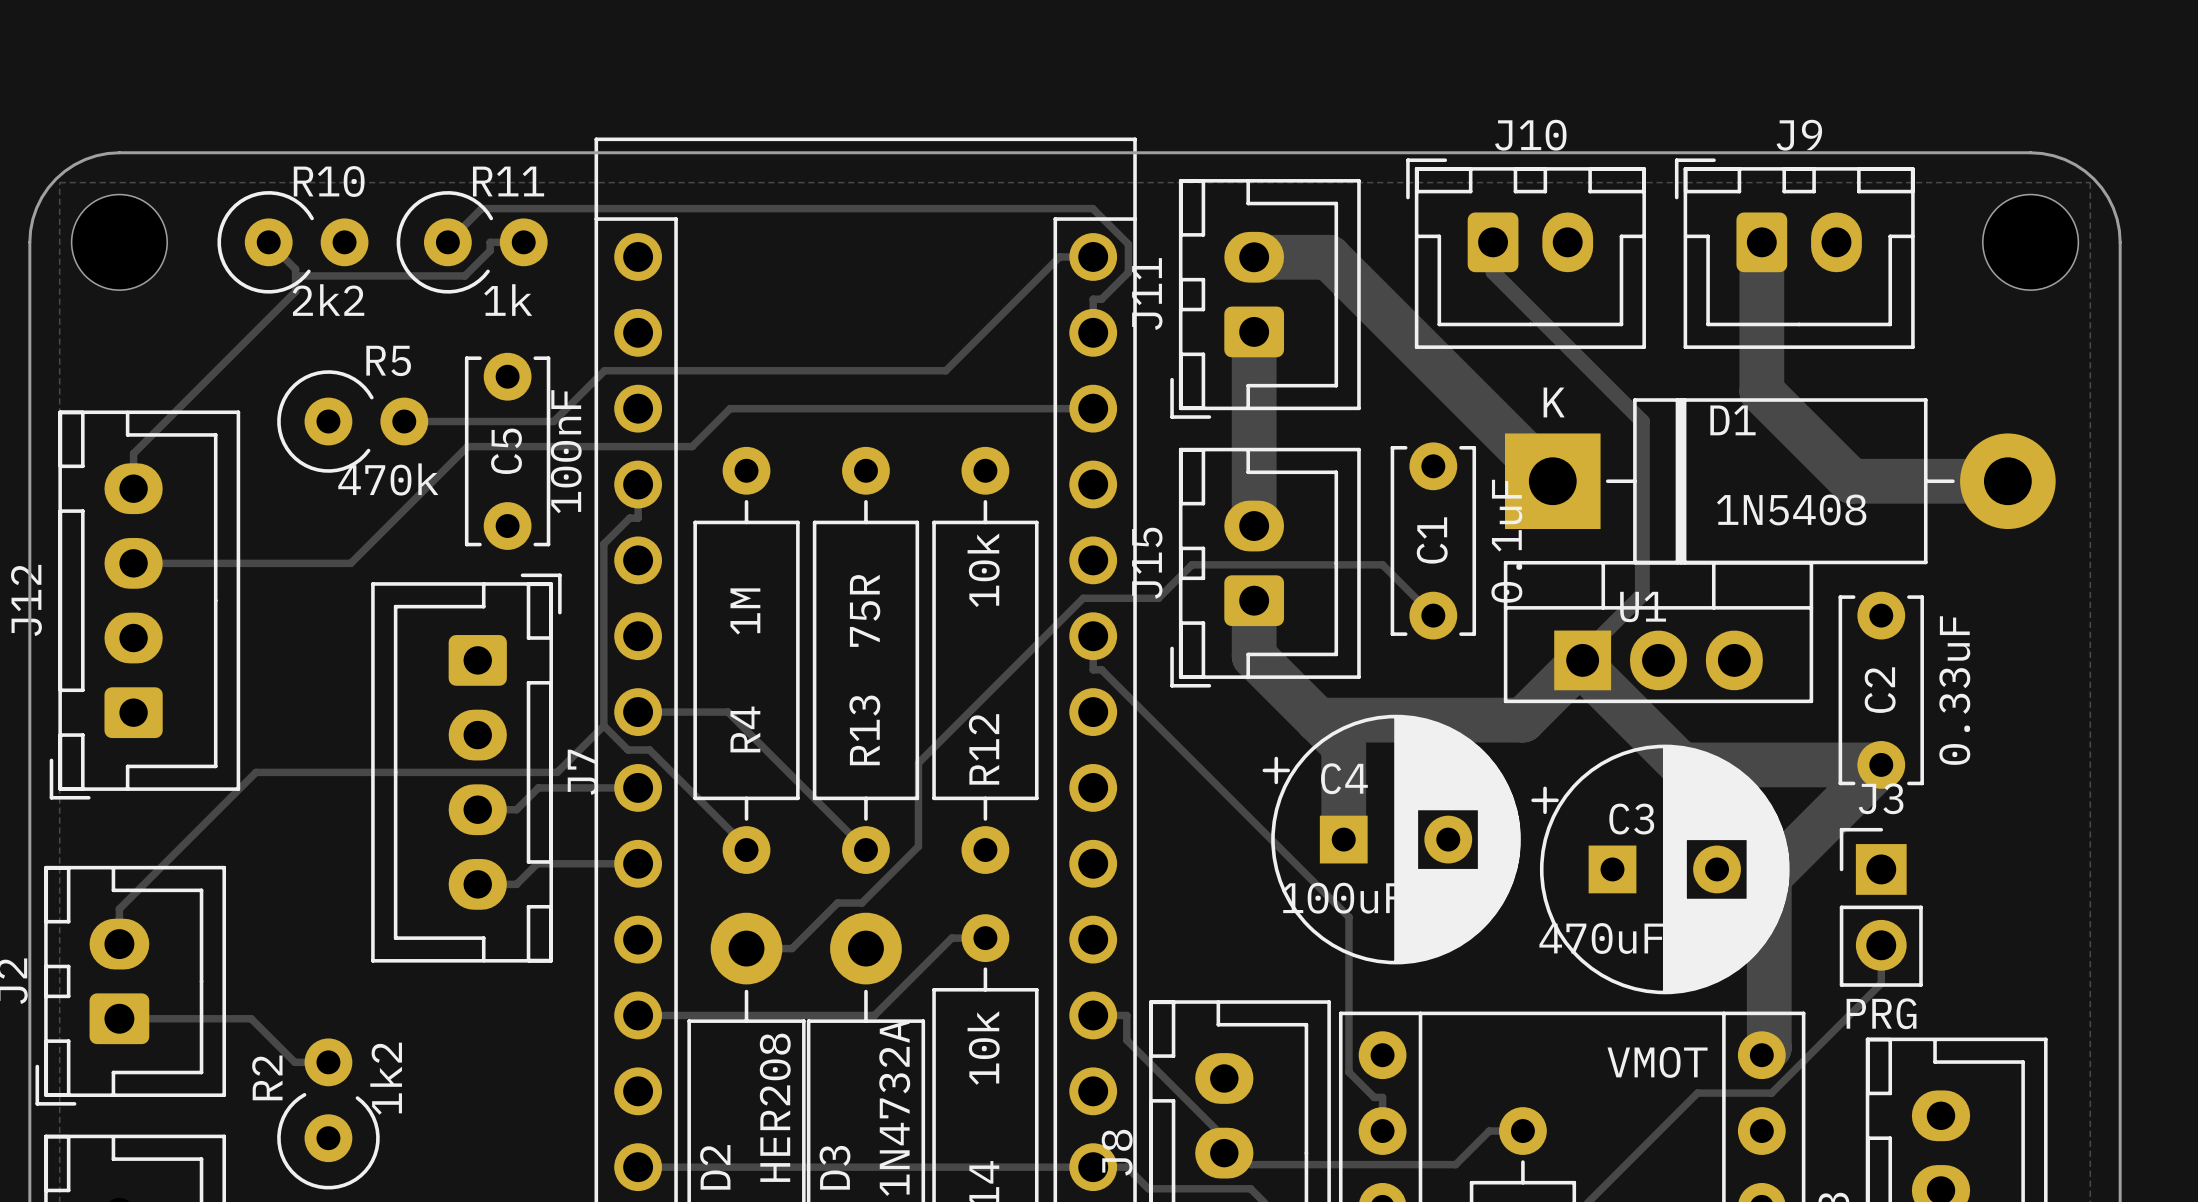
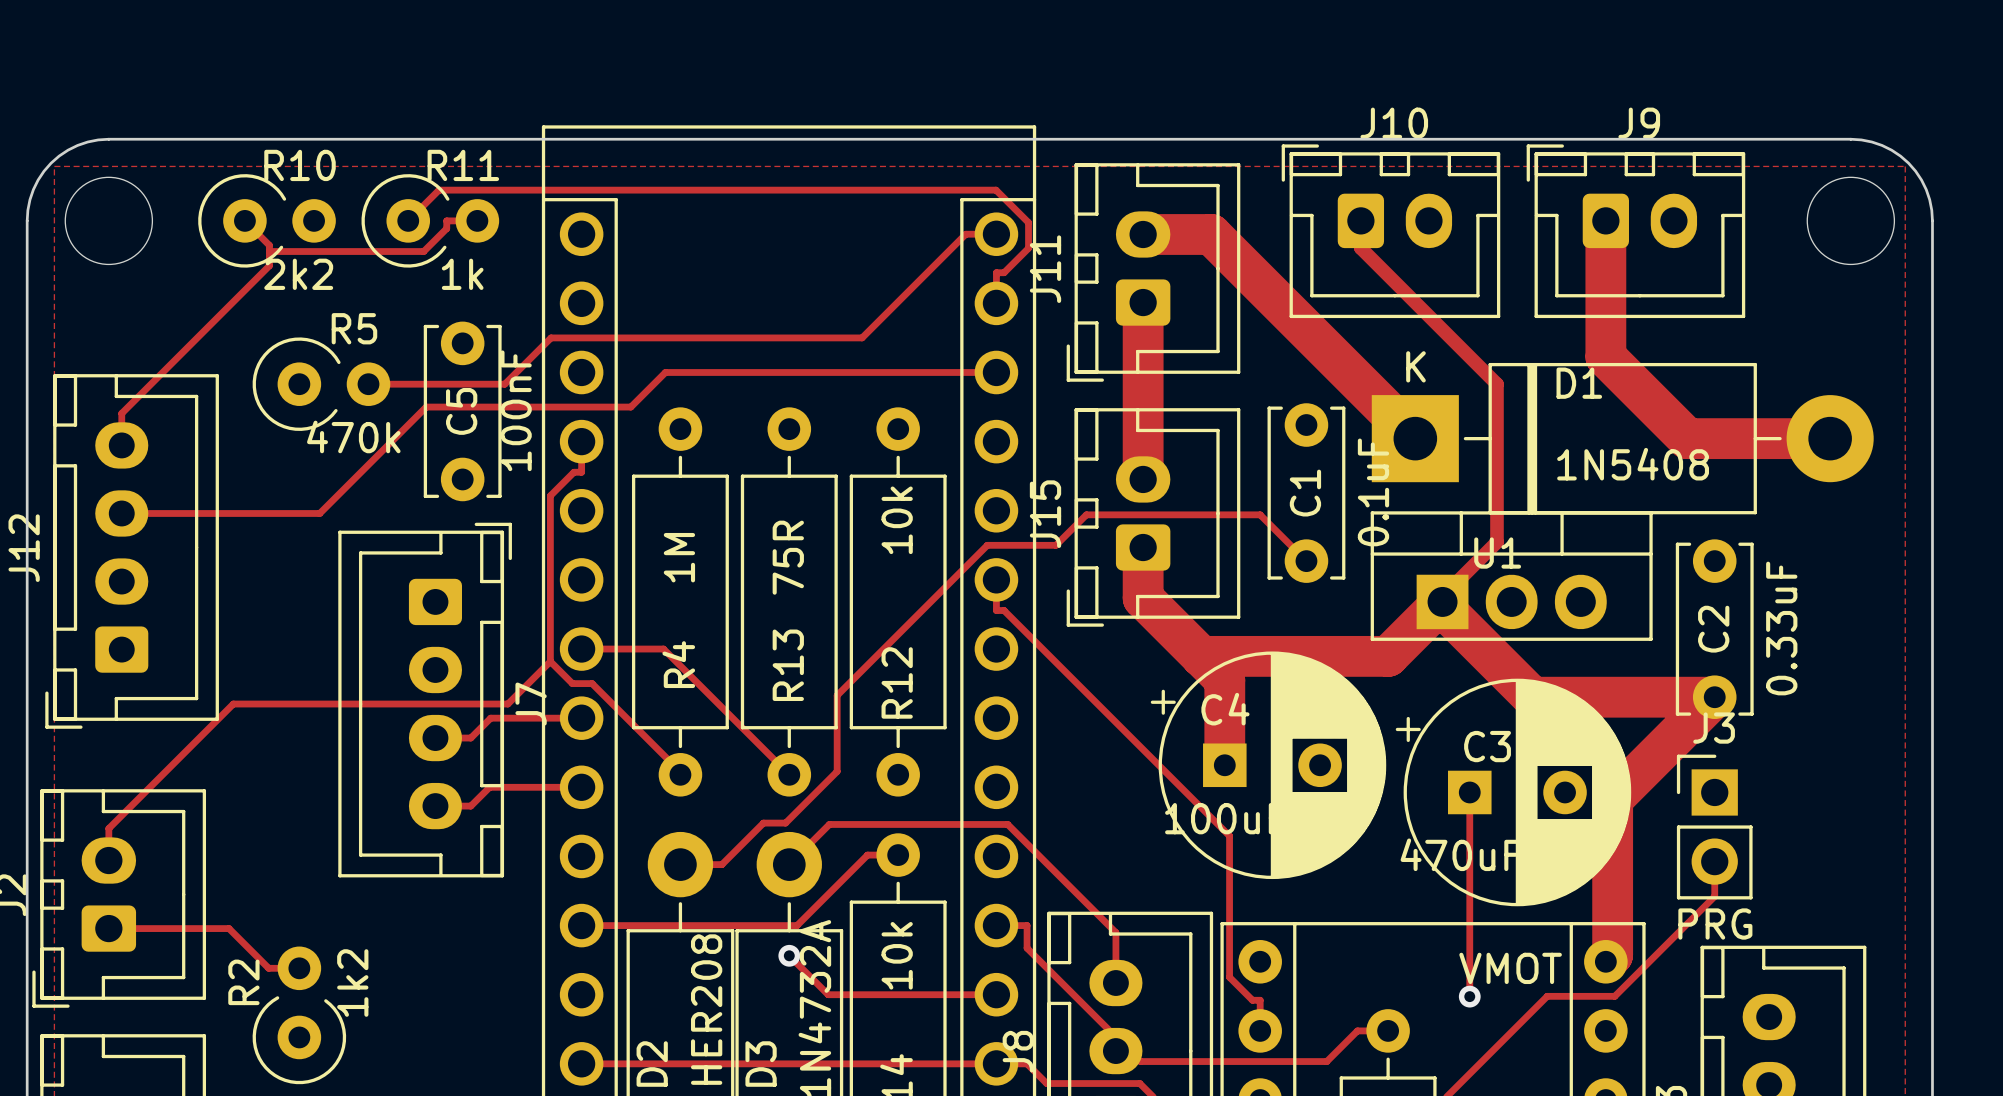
track: none -> (1469, 792) (1469, 996)
track: none -> (789, 864) (829, 824) (1007, 824) (1115, 932) (1115, 983)
track: none -> (789, 955) (828, 994) (996, 994)
via: none -> (789, 955)
via: none -> (1469, 996)

